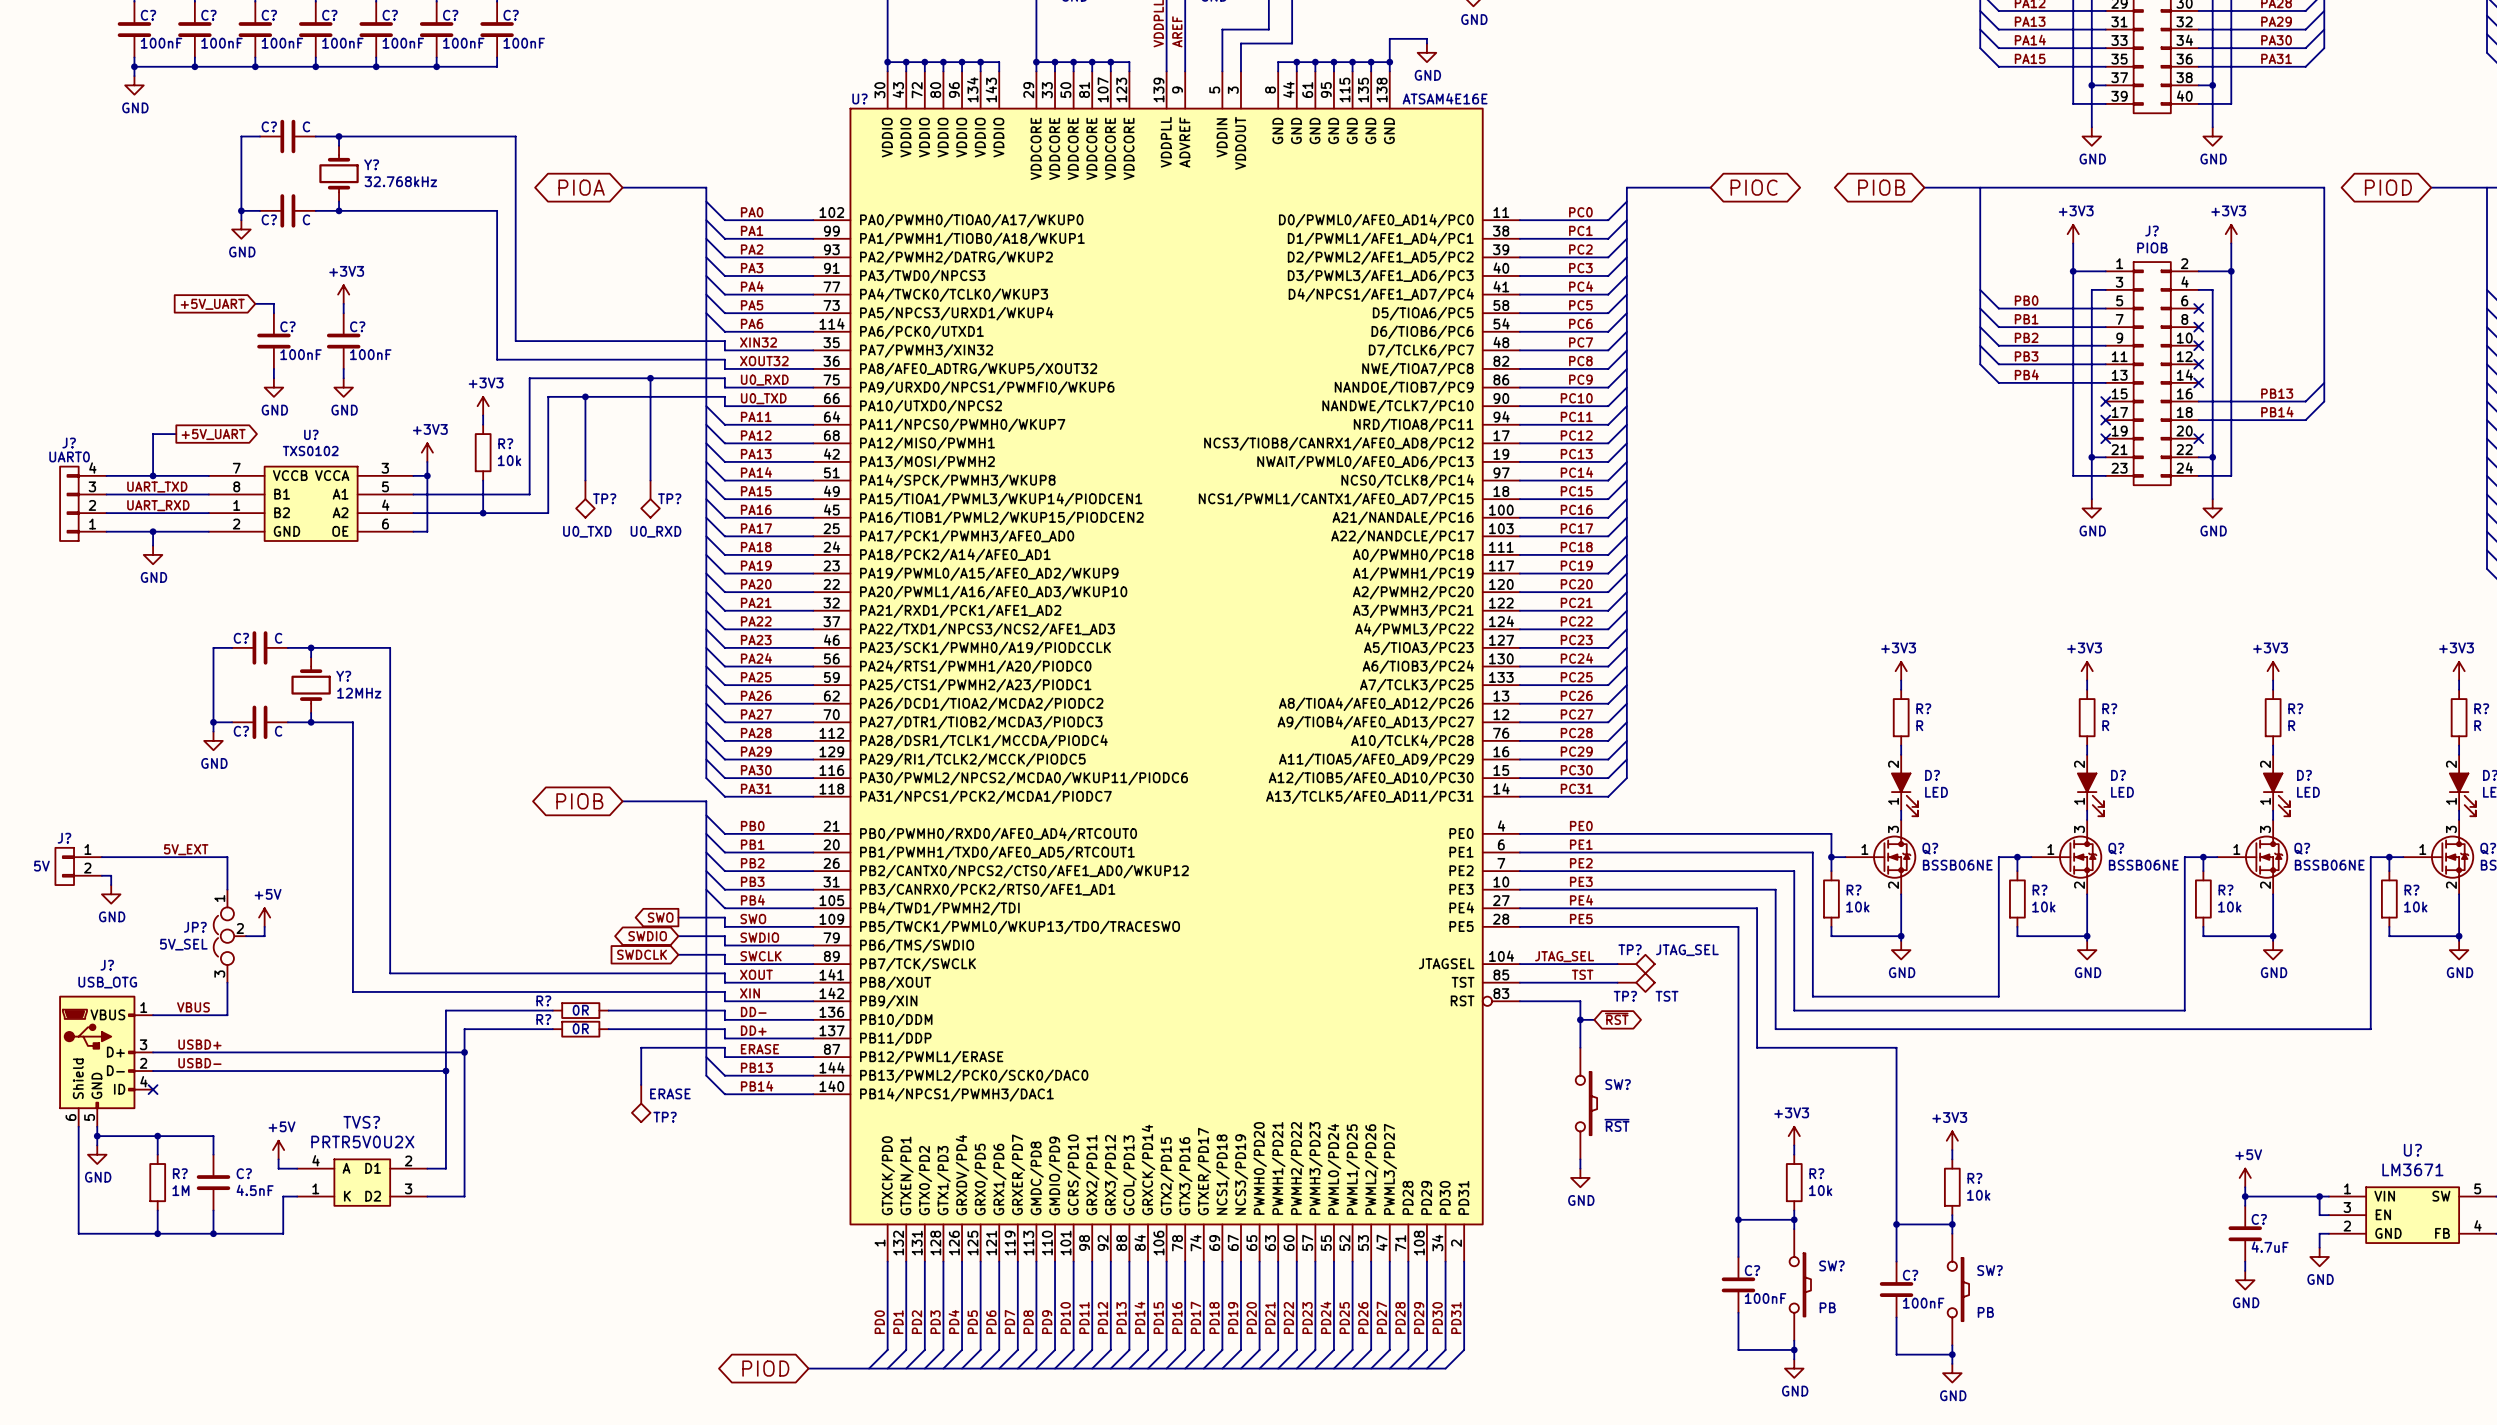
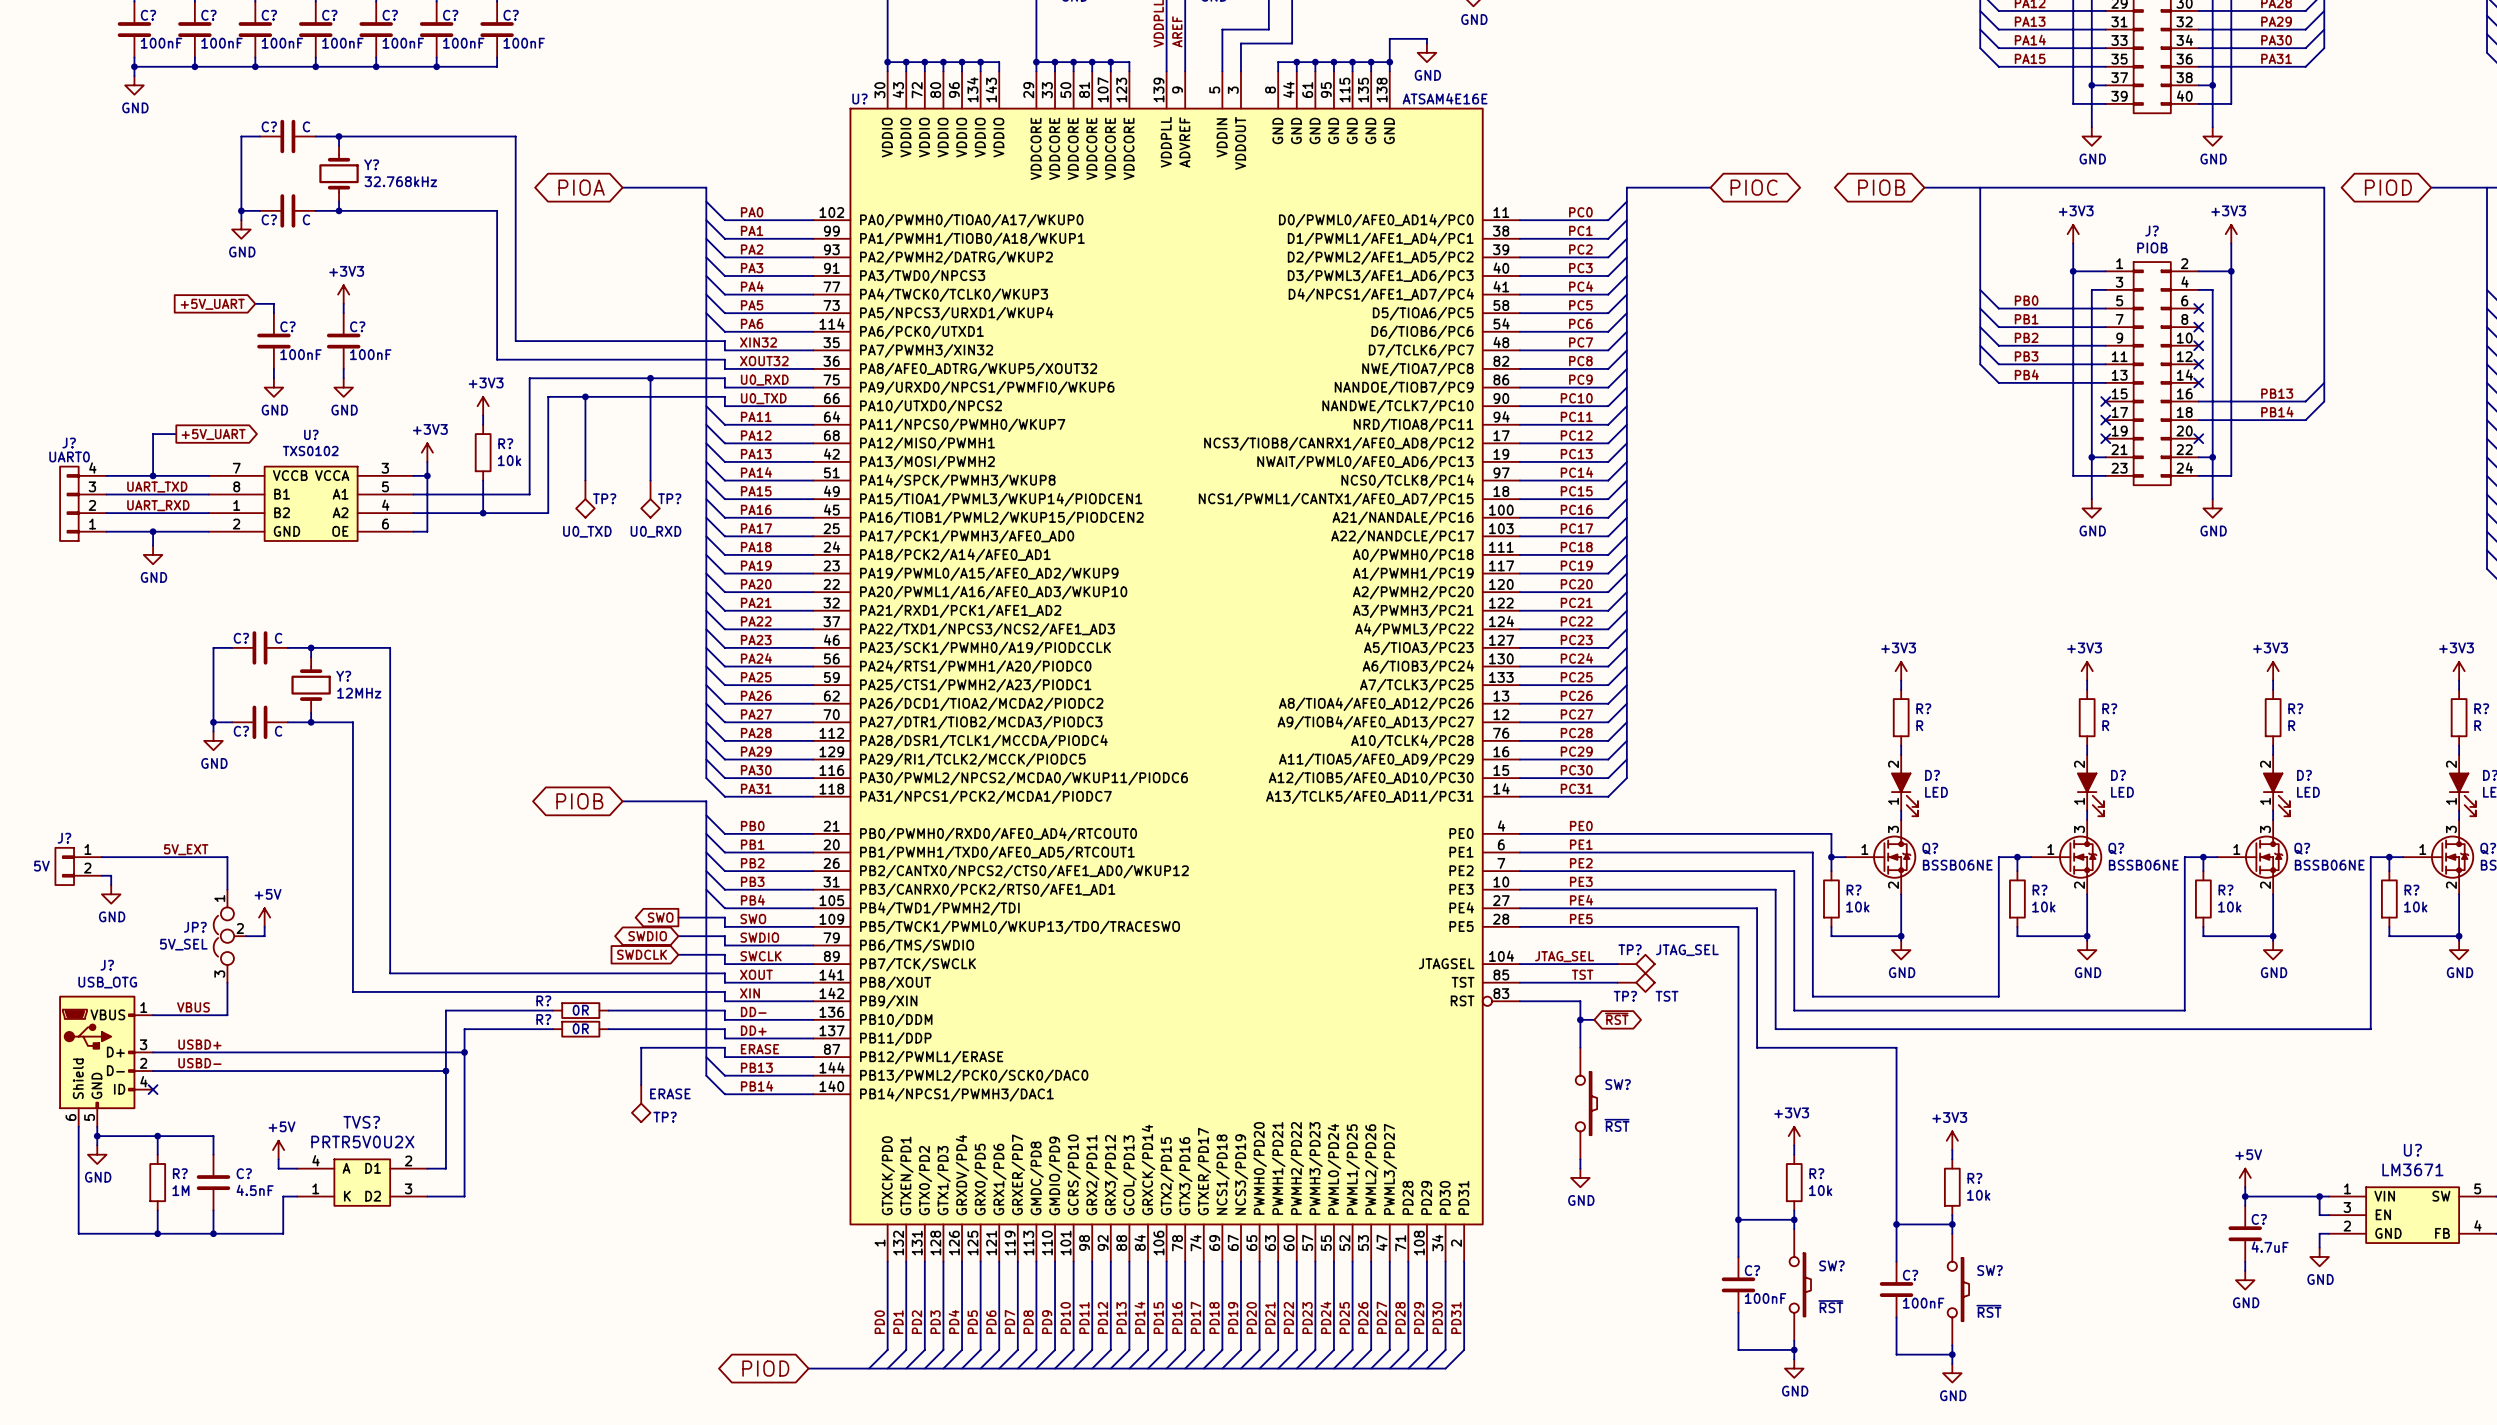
SW? value: PB (1827, 1307) -> ~{RST} (1830, 1306)
SW? value: PB (1985, 1312) -> ~{RST} (1988, 1311)

